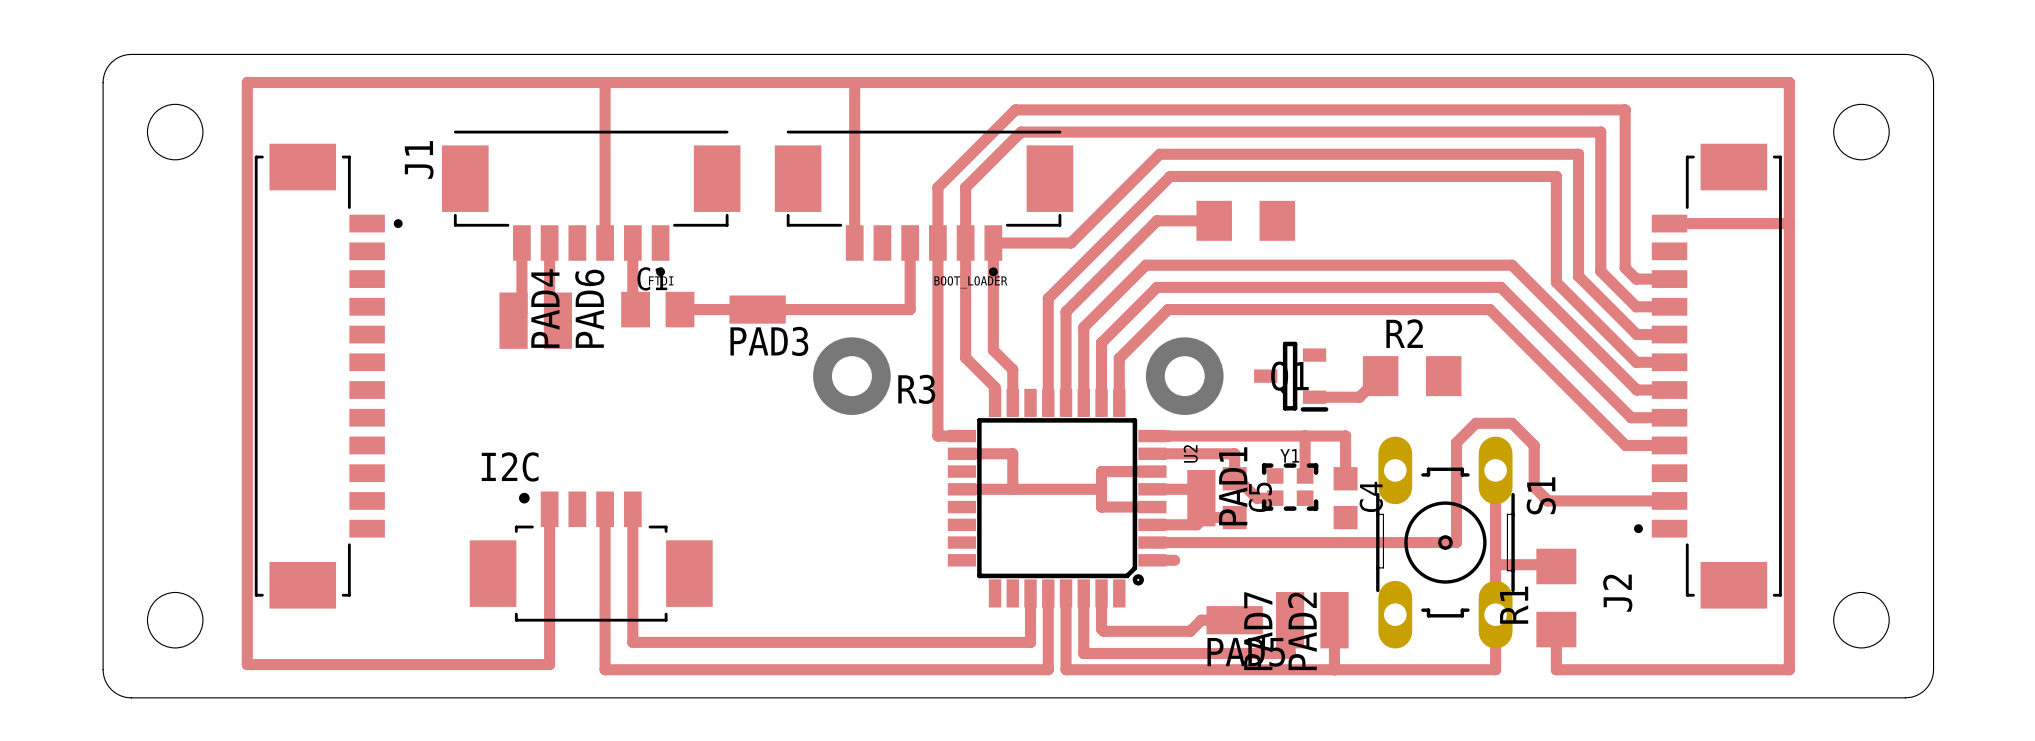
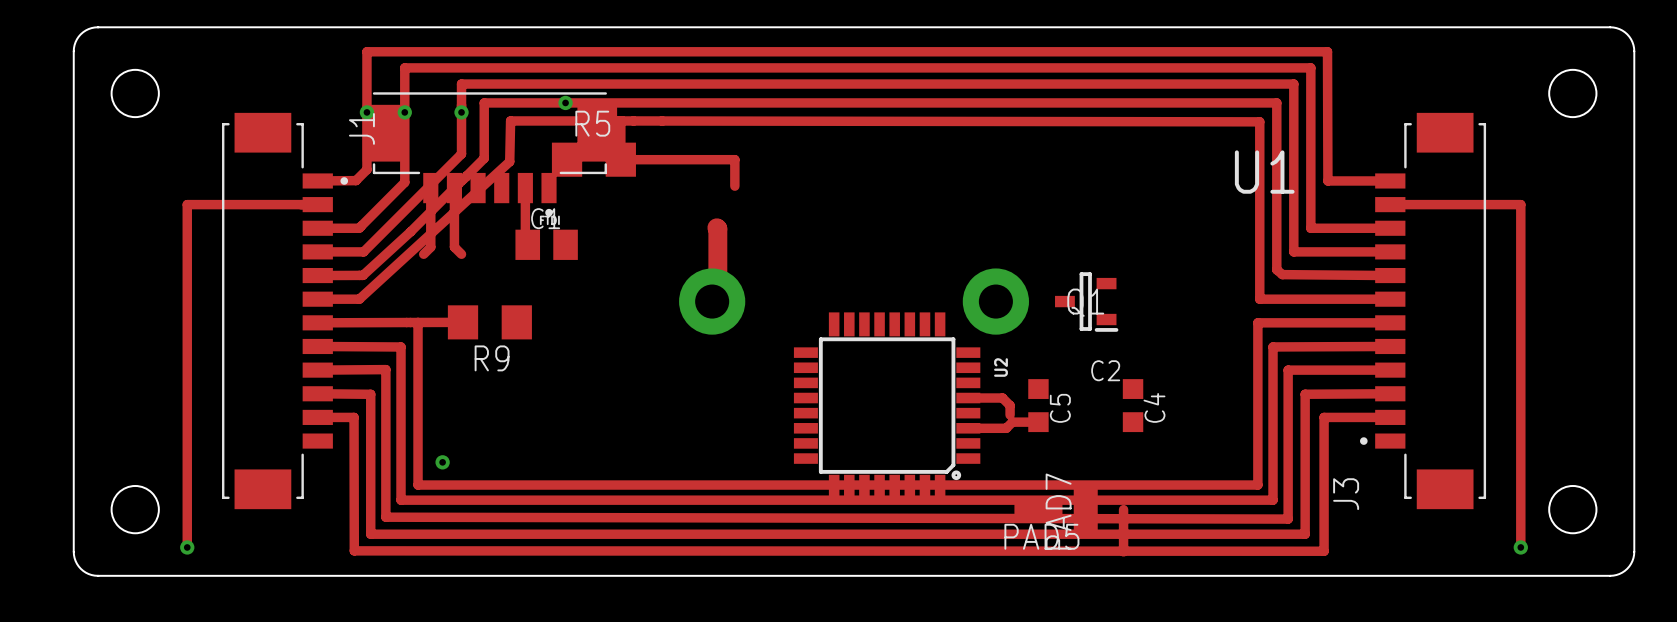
track: (602, 82) (605, 85) (605, 243) -> none
track: (854, 82) (854, 243) -> none
via: none -> (565, 102)
via: none -> (366, 112)
via: none -> (404, 112)
via: none -> (461, 112)
track: none -> (622, 120) (620, 159) (734, 159) (734, 186)
BOOT_LOADER: (924, 203) -> none
R5: none -> (593, 159)
track: (1214, 220) (1157, 220) (1066, 311) (1066, 402) -> none
R3: (1245, 220) -> none
track: (1669, 223) (1789, 223) -> none
U1: none -> (1264, 172)
track: none -> (317, 180) (355, 180) (366, 169) (366, 51) (1327, 51) (1327, 180) (1390, 180)
track: none -> (458, 184) (362, 275) (317, 275)
track: none -> (458, 184) (484, 158) (484, 102) (1276, 102) (1276, 269) (1282, 274) (1390, 275)
track: (910, 243) (910, 309) (679, 309) -> none
track: none -> (300, 204) (317, 204) (187, 204) (187, 547)
track: none -> (1390, 204) (1520, 204) (1520, 547)
track: (1669, 279) (1636, 279) (1625, 267) (1625, 109) (1015, 109) (937, 187) (937, 436) (961, 436) -> none
track: none -> (716, 227) (717, 295) (712, 301)
track: none -> (317, 228) (359, 228) (404, 182) (404, 67) (1310, 67) (1310, 228) (1390, 228)
track: (1669, 306) (1636, 306) (1600, 271) (1600, 132) (1021, 132) (965, 187) (965, 357) (995, 387) (995, 402) -> none
PAD3: (757, 309) -> none
track: none -> (317, 251) (363, 251) (461, 154) (461, 84) (1293, 84) (1293, 251) (1390, 251)
PAD4: (513, 320) -> none
PAD6: (557, 320) -> none
track: (1669, 334) (1636, 334) (1578, 276) (1578, 154) (1159, 154) (1071, 243) (993, 243) (993, 350) (1012, 369) (1012, 402) -> none
track: (1669, 362) (1636, 362) (1556, 282) (1556, 176) (1170, 176) (1048, 298) (1048, 402) -> none
track: none -> (317, 299) (359, 299) (509, 161) (510, 120) (633, 120) (1259, 121) (1259, 299) (1390, 299)
J1 position: (328, 376) -> (285, 311)
track: (1380, 376) (1359, 397) (1314, 397) -> none
R2: (1412, 376) -> none
J2: (1707, 376) -> none
J3: none -> (1423, 311)
track: (1669, 390) (1636, 390) (1512, 265) (1145, 265) (1083, 327) (1083, 402) -> none
track: none -> (418, 322) (317, 322)
track: none -> (418, 322) (418, 485) (1257, 485) (1257, 322) (1390, 322)
track: none -> (463, 322) (418, 322)
R9: none -> (489, 322)
track: (1101, 402) (1101, 342) (1157, 287) (1500, 287) (1631, 417) (1669, 417) (1666, 420) -> none
track: (1119, 402) (1119, 358) (1168, 309) (1489, 309) (1625, 445) (1669, 445) -> none
track: none -> (317, 346) (401, 347) (401, 500) (1273, 500) (1273, 346) (1390, 346)
track: (1152, 436) (1345, 436) (1345, 478) -> none
track: (1305, 436) (1305, 475) -> none
track: (961, 453) (1012, 453) (1012, 489) -> none
track: (1152, 453) (1234, 453) (1234, 478) (1237, 478) (1256, 498) (1275, 498) -> none
track: none -> (317, 370) (385, 369) (385, 517) (1288, 519) (1288, 370) (1390, 370)
C2: none -> (1105, 370)
track: (1495, 470) (1495, 669) (1066, 669) (1066, 593) -> none
track: (1152, 471) (1101, 471) (1101, 507) (1152, 507) -> none
track: none -> (317, 393) (370, 394) (370, 534) (1305, 534) (1305, 394) (1390, 393)
Y1: (1290, 487) -> none
track: (961, 489) (1101, 489) -> none
PAD1: (1201, 498) -> none
track: (1669, 500) (1547, 500) (1534, 487) (1534, 445) (1512, 423) (1475, 423) (1456, 442) (1456, 542) (1152, 542) -> none
track: (549, 509) (549, 664) (247, 664) (247, 82) (1789, 82) (1789, 669) (1556, 669) (1556, 629) -> none
track: (605, 509) (605, 669) (1048, 669) (1048, 593) -> none
track: (632, 509) (632, 642) (1030, 642) (1030, 593) -> none
track: none -> (317, 417) (354, 417) (354, 550) (1324, 551) (1324, 417) (1390, 417)
S1: (1445, 542) -> none
I2C: (591, 556) -> none
track: (1152, 560) (1174, 560) -> none
via: none -> (442, 462)
track: (1495, 564) (1554, 564) (1556, 566) -> none
track: (1083, 593) (1083, 653) (1290, 653) (1290, 620) -> none
track: (1101, 593) (1101, 629) (1103, 631) (1190, 631) (1201, 620) (1234, 620) -> none
R1: (1556, 598) -> none
PAD2: (1334, 620) -> none
via: none -> (187, 547)
via: none -> (1520, 547)

